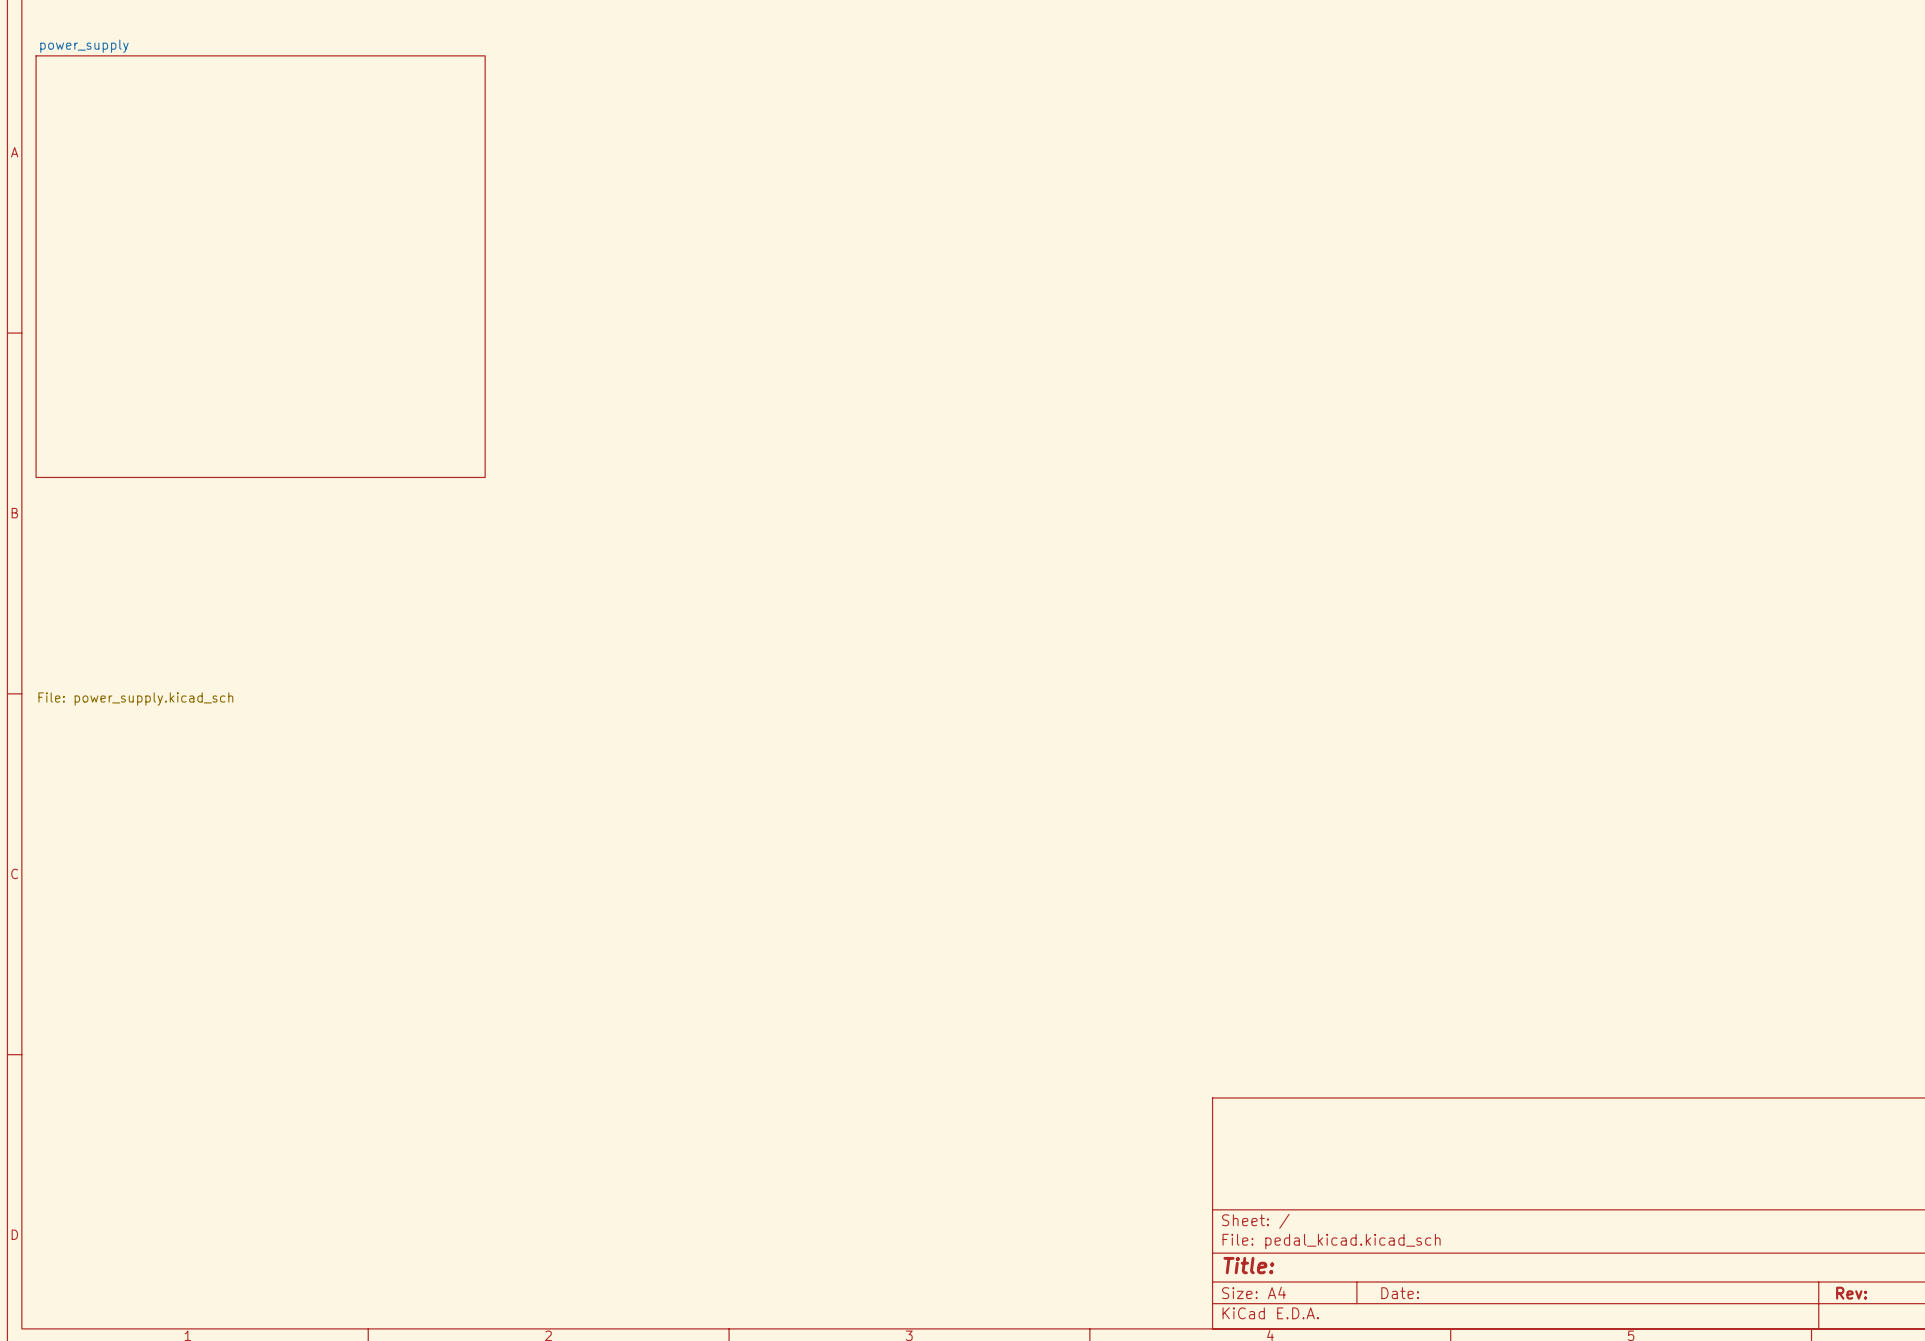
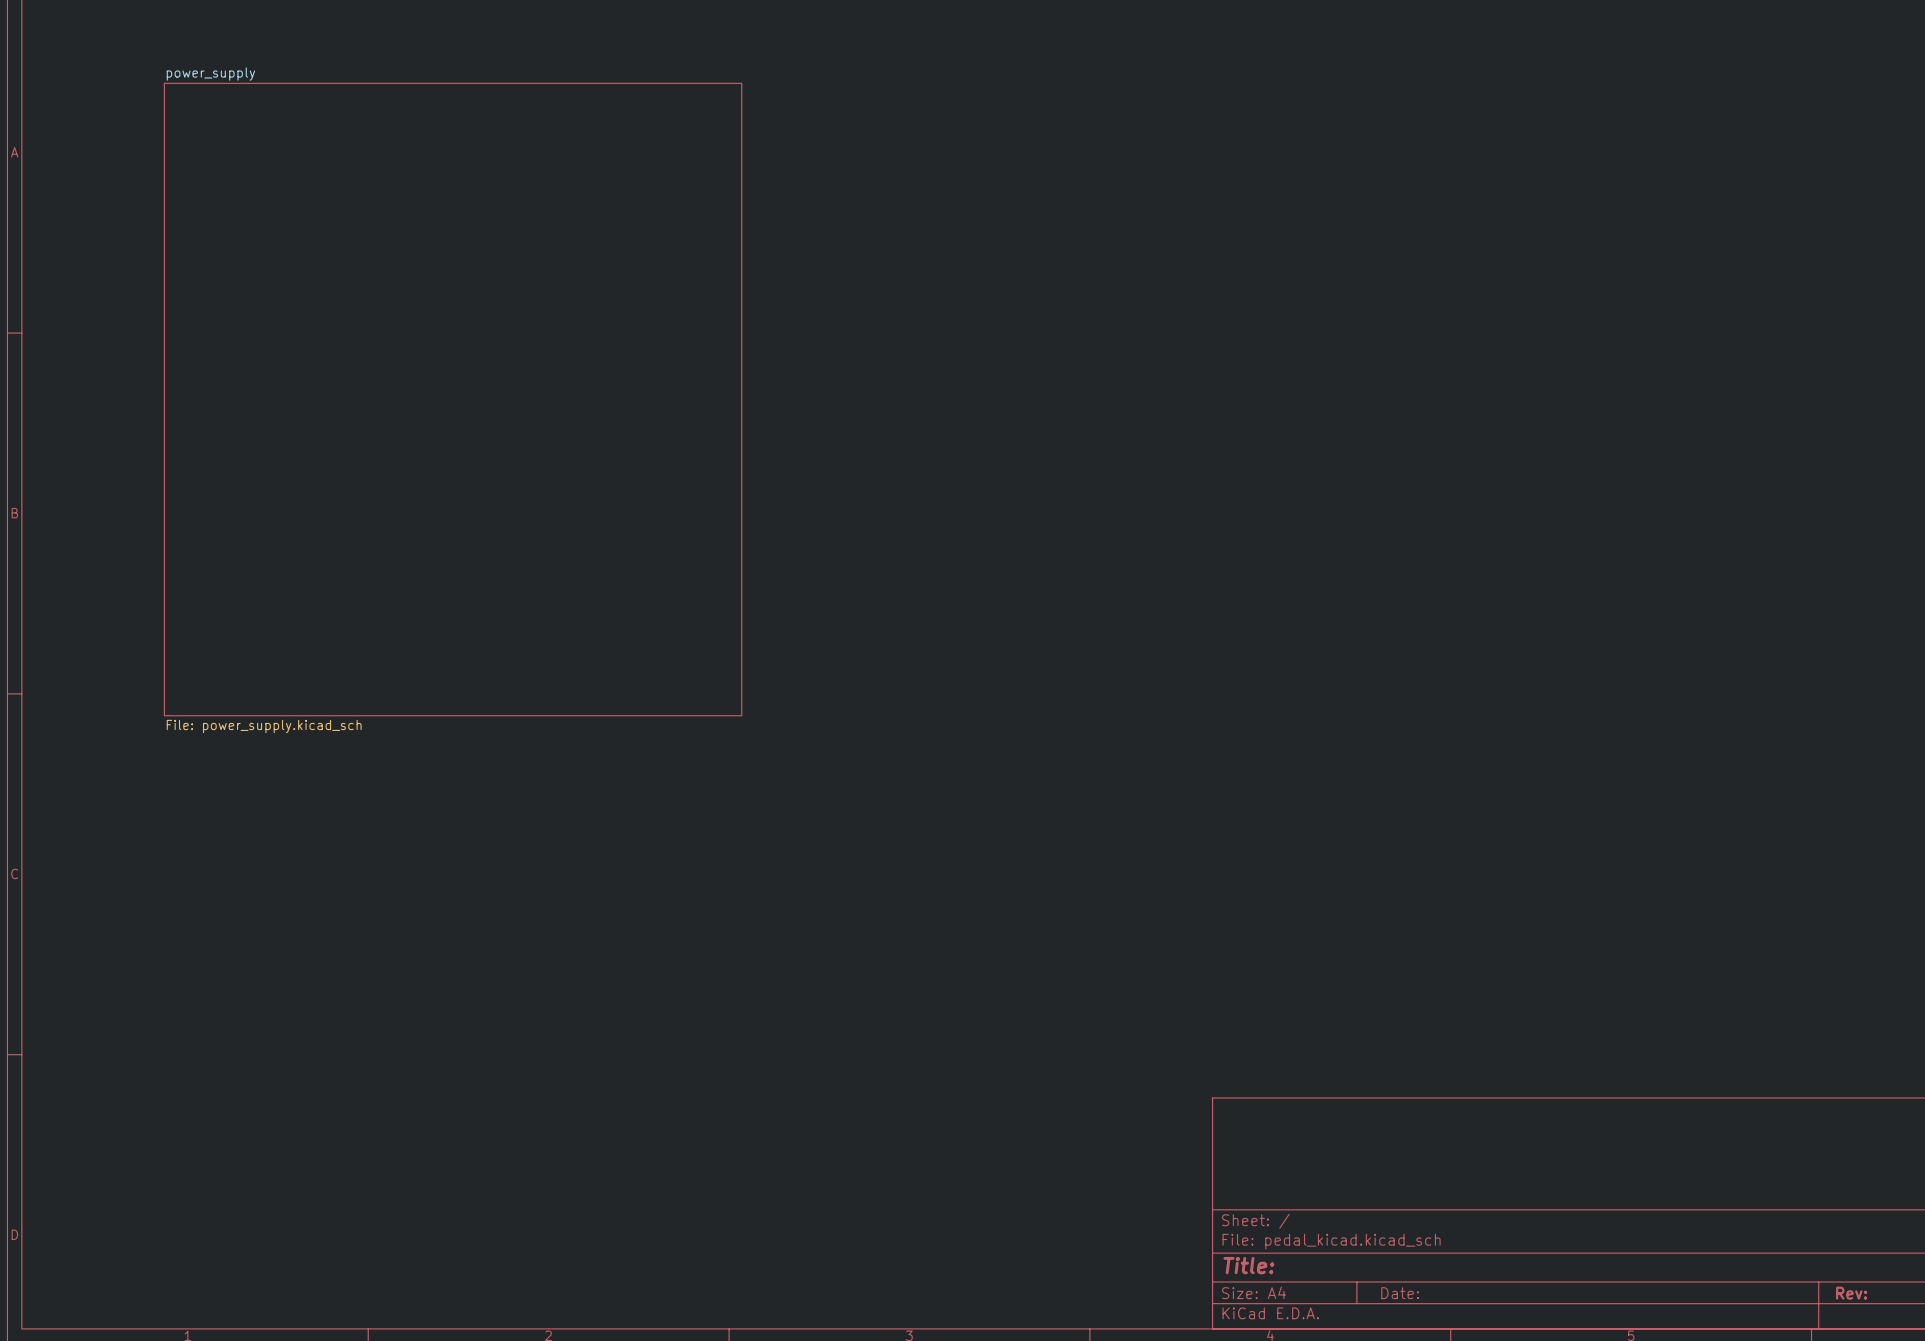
sheet power_supply: File: power_supply.kicad_sch (260, 266) -> none
sheet power_supply: none -> File: power_supply.kicad_sch (453, 399)

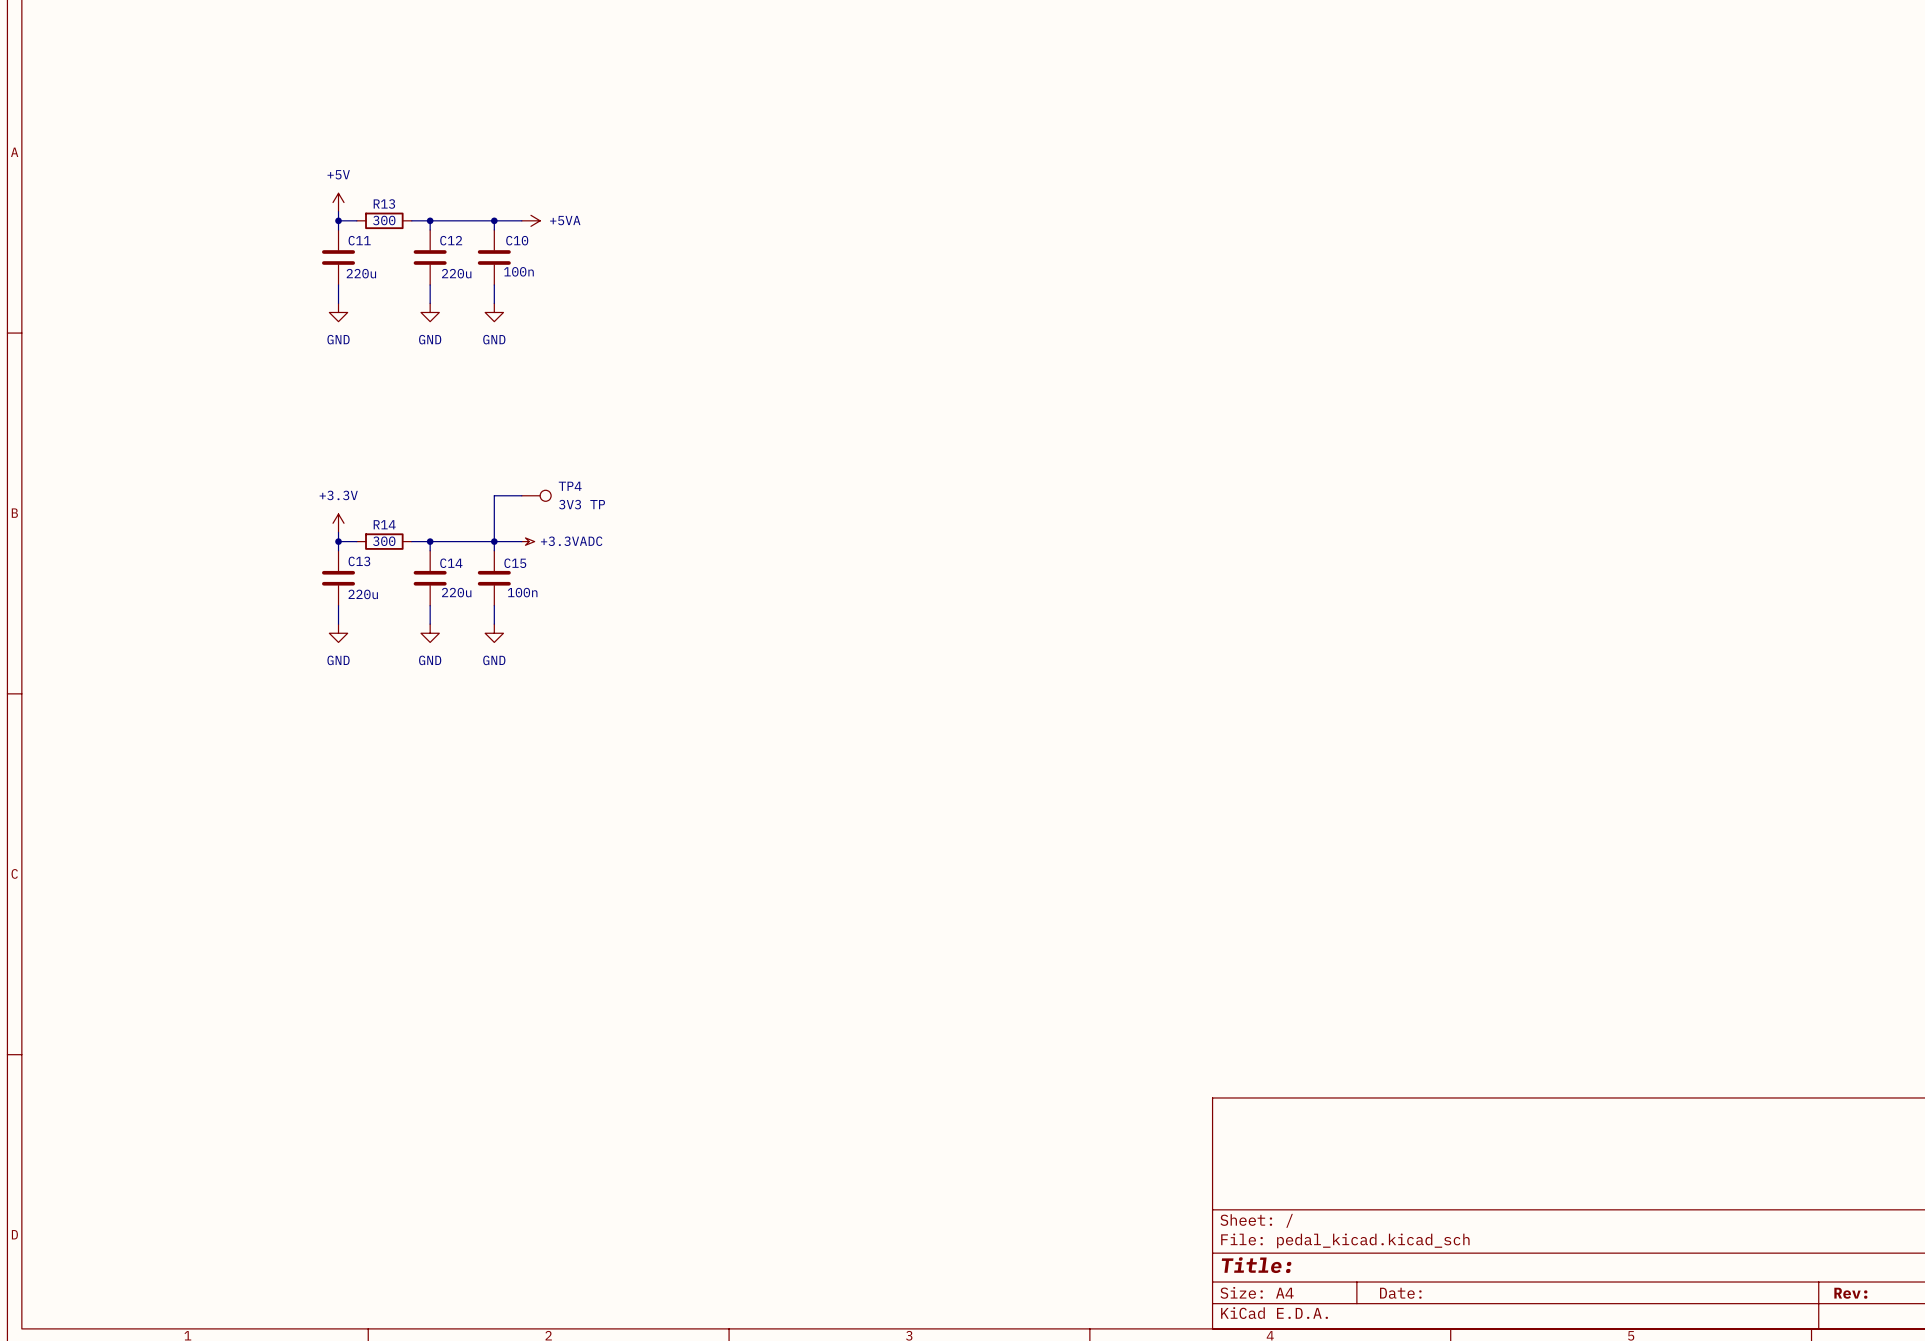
power symbol: none -> +5V (338, 202)
wire: none -> (338, 211) (338, 230)
wire: none -> (338, 220) (356, 220)
junction: none -> (338, 220)
R13: none -> 300 (384, 220)
wire: none -> (411, 220) (521, 220)
wire: none -> (430, 220) (430, 230)
junction: none -> (430, 220)
wire: none -> (494, 220) (494, 230)
junction: none -> (494, 220)
power symbol: none -> +5VA (530, 220)
C11: none -> 220u (338, 257)
C12: none -> 220u (430, 257)
C10: none -> 100n (494, 257)
wire: none -> (338, 284) (338, 303)
wire: none -> (430, 284) (430, 303)
wire: none -> (494, 284) (494, 303)
power symbol: none -> GND (338, 312)
power symbol: none -> GND (430, 312)
power symbol: none -> GND (494, 312)
sheet power_supply: File: power_supply.kicad_sch (453, 399) -> none
wire: none -> (521, 495) (494, 495) (494, 550)
TP4: none -> 3V3 TP (536, 495)
power symbol: none -> +3.3V (338, 523)
wire: none -> (338, 532) (338, 550)
wire: none -> (338, 541) (356, 541)
junction: none -> (338, 541)
R14: none -> 300 (384, 541)
wire: none -> (411, 541) (521, 541)
wire: none -> (430, 541) (430, 550)
junction: none -> (430, 541)
junction: none -> (494, 541)
power symbol: none -> +3.3VADC (528, 541)
C13: none -> 220u (338, 578)
C14: none -> 220u (430, 578)
C15: none -> 100n (494, 578)
wire: none -> (338, 605) (338, 624)
wire: none -> (430, 605) (430, 624)
wire: none -> (494, 605) (494, 624)
power symbol: none -> GND (338, 633)
power symbol: none -> GND (430, 633)
power symbol: none -> GND (494, 633)

